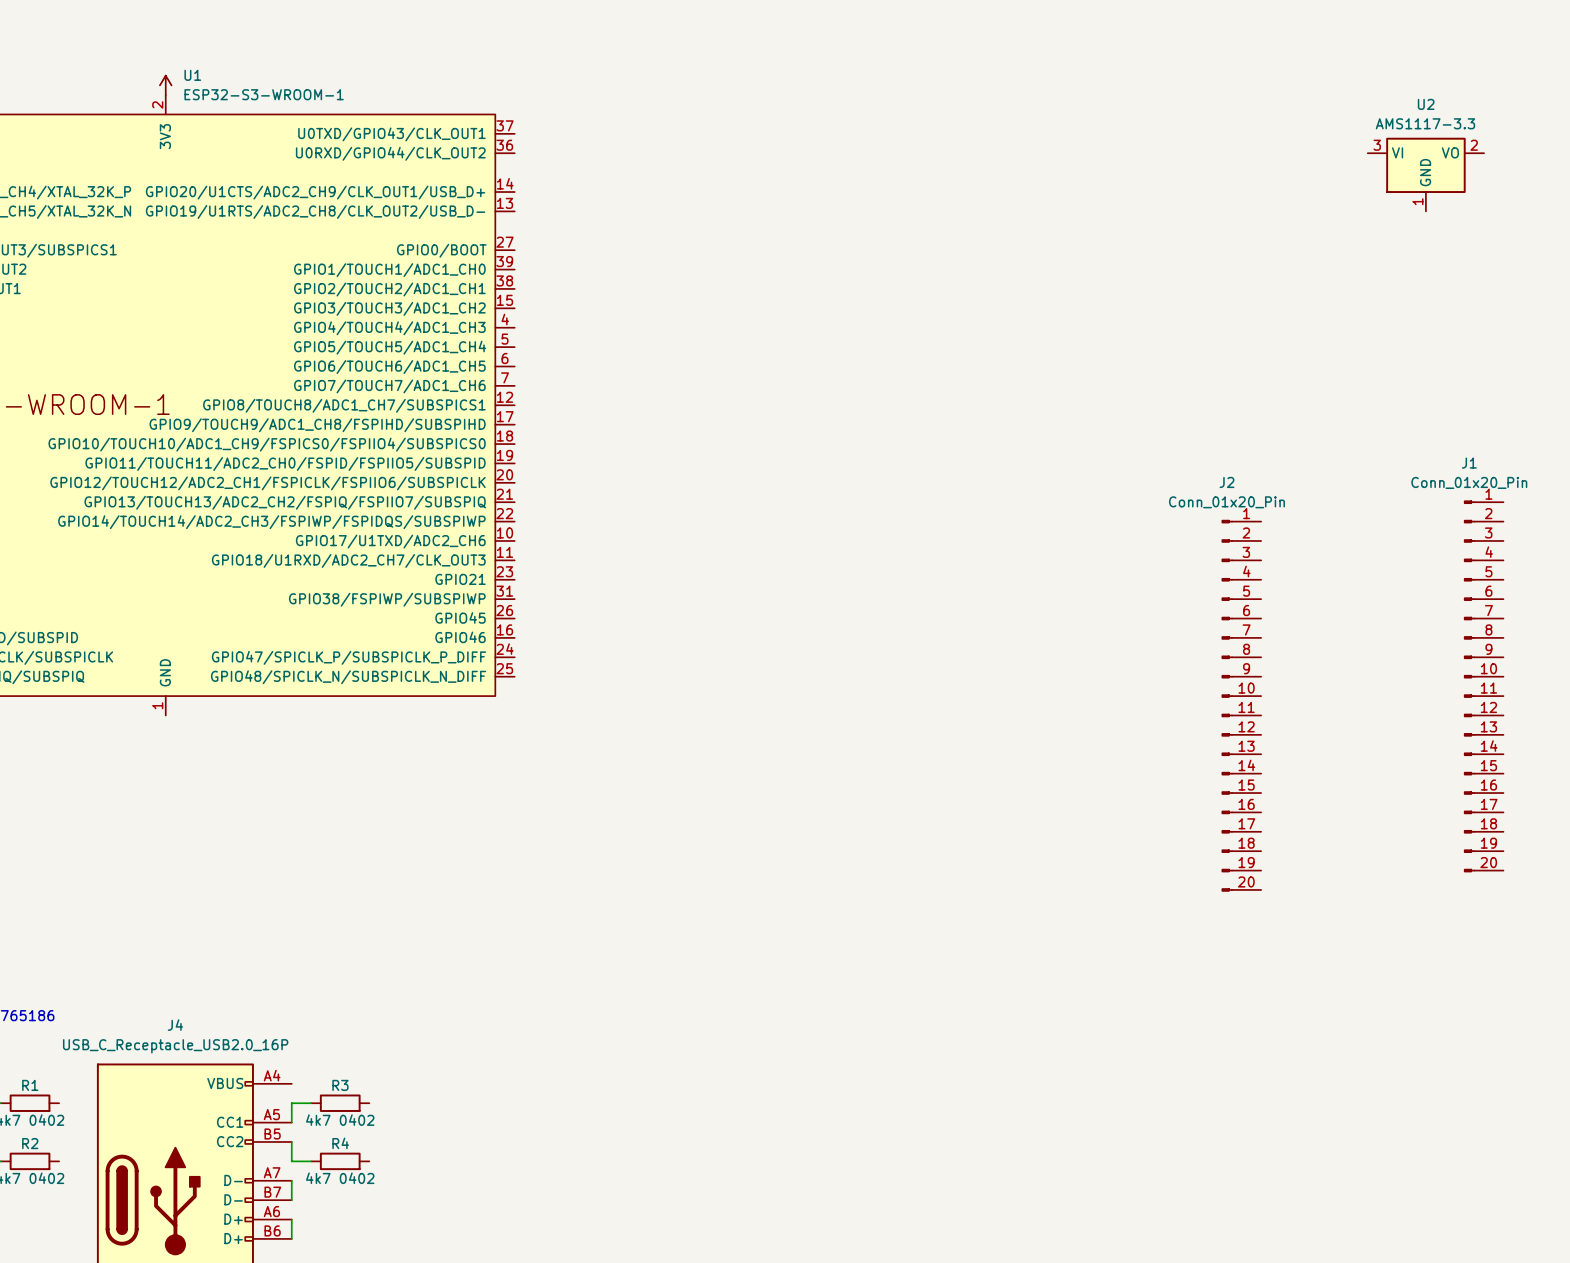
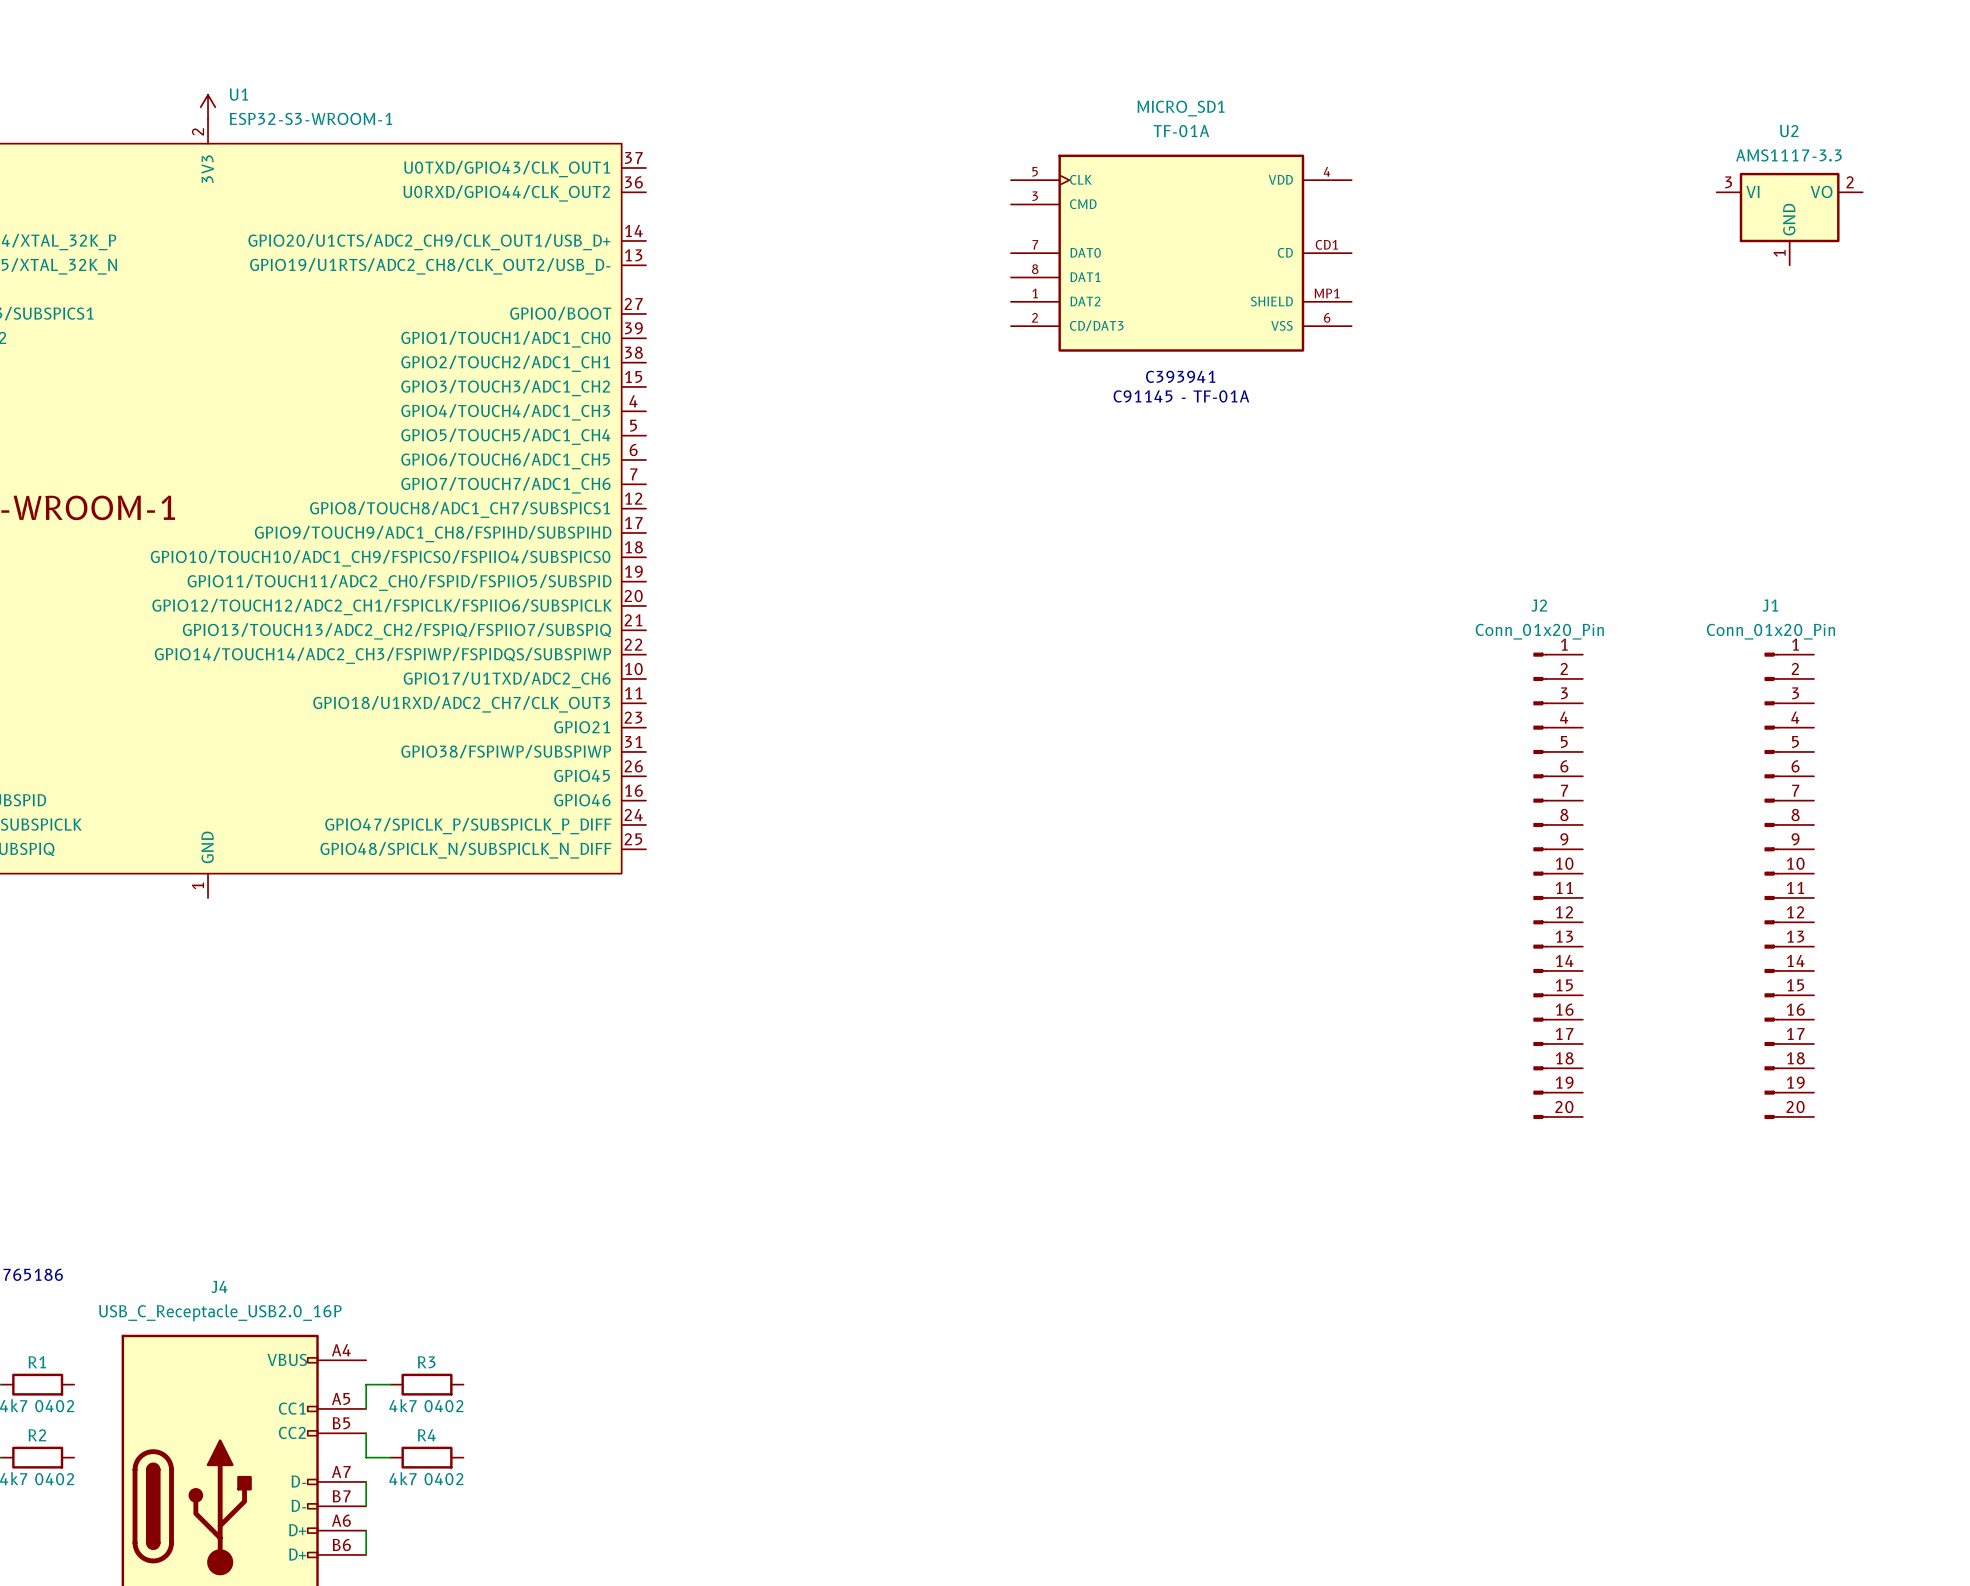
MICRO_SD1: none -> TF-01A (1181, 253)
text: none -> C393941 (1180, 376)
text: none -> C91145 - TF-01A (1181, 396)
J1 position: (1483, 686) -> (1789, 885)

